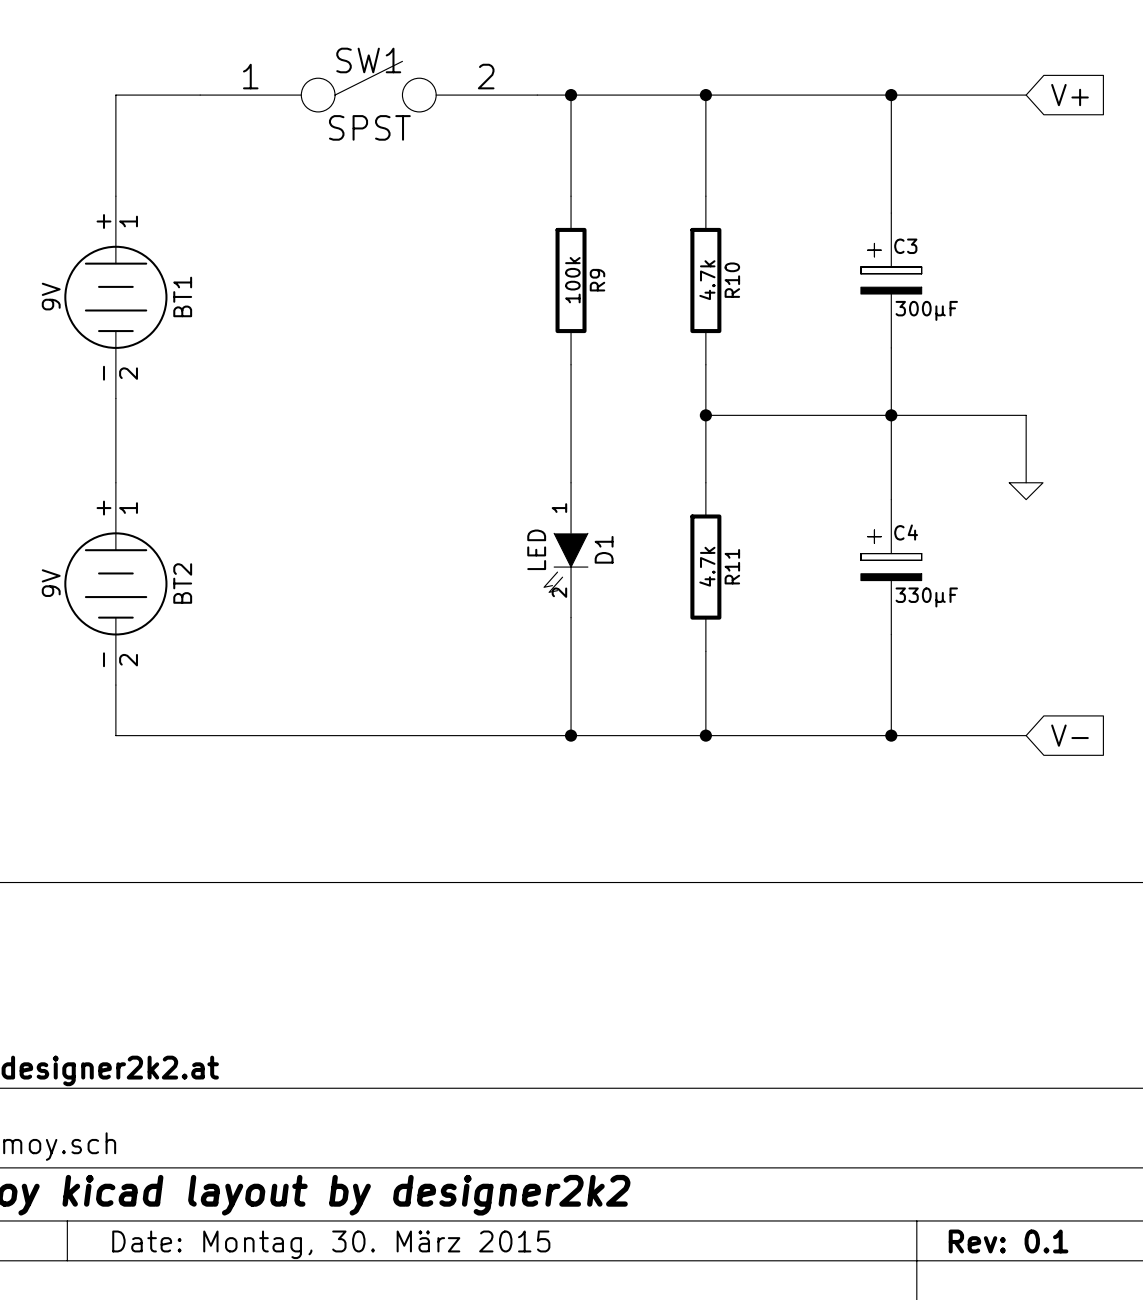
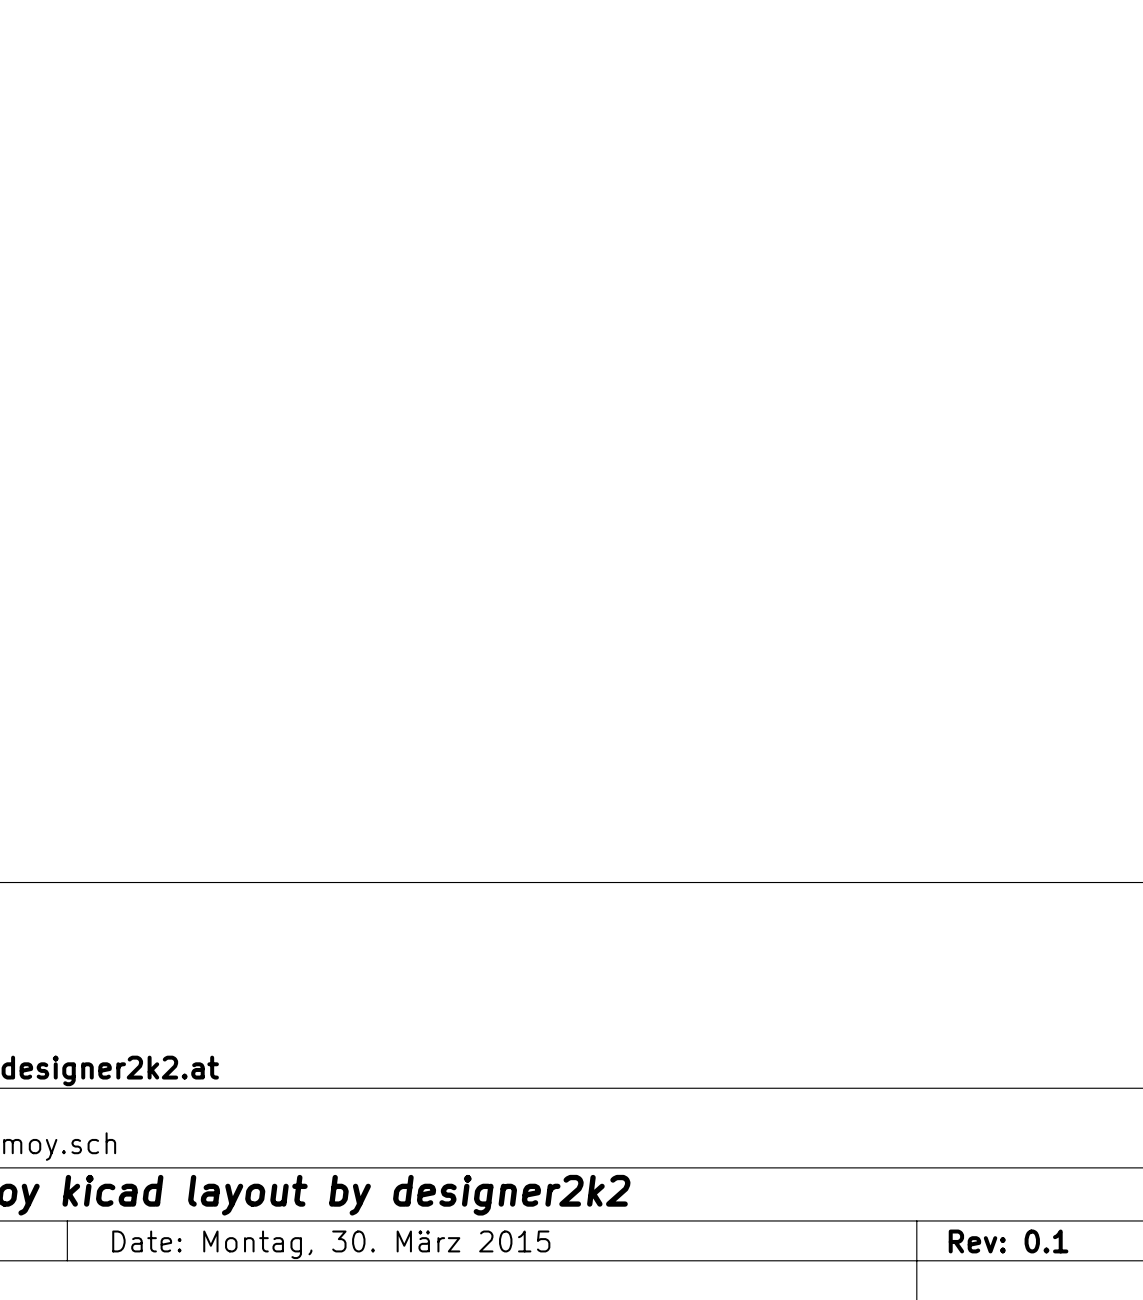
SW1: SPST (368, 86) -> none
wire: (200, 95) (115, 95) (115, 196) -> none
wire: (537, 95) (1026, 95) -> none
wire: (571, 95) (571, 196) -> none
junction: (571, 95) -> none
wire: (705, 95) (705, 196) -> none
junction: (705, 95) -> none
wire: (891, 95) (891, 213) -> none
junction: (891, 95) -> none
global label: V+ (1069, 95) -> none
R9: 100k (571, 280) -> none
R10: 4.7k (705, 280) -> none
C3: 300µF (891, 280) -> none
BT1: 9V (115, 297) -> none
wire: (891, 347) (891, 499) -> none
wire: (571, 364) (571, 482) -> none
wire: (705, 364) (705, 482) -> none
wire: (115, 398) (115, 482) -> none
wire: (705, 415) (1026, 415) (1026, 482) -> none
junction: (705, 415) -> none
junction: (891, 415) -> none
power symbol: (1026, 491) -> none
D1: LED (565, 550) -> none
R11: 4.7k (705, 567) -> none
C4: 330µF (891, 567) -> none
BT2: 9V (115, 583) -> none
wire: (571, 617) (571, 735) -> none
wire: (891, 634) (891, 735) -> none
wire: (705, 651) (705, 735) -> none
wire: (115, 685) (115, 735) (1026, 735) -> none
junction: (571, 735) -> none
junction: (705, 735) -> none
junction: (891, 735) -> none
global label: V- (1069, 735) -> none

